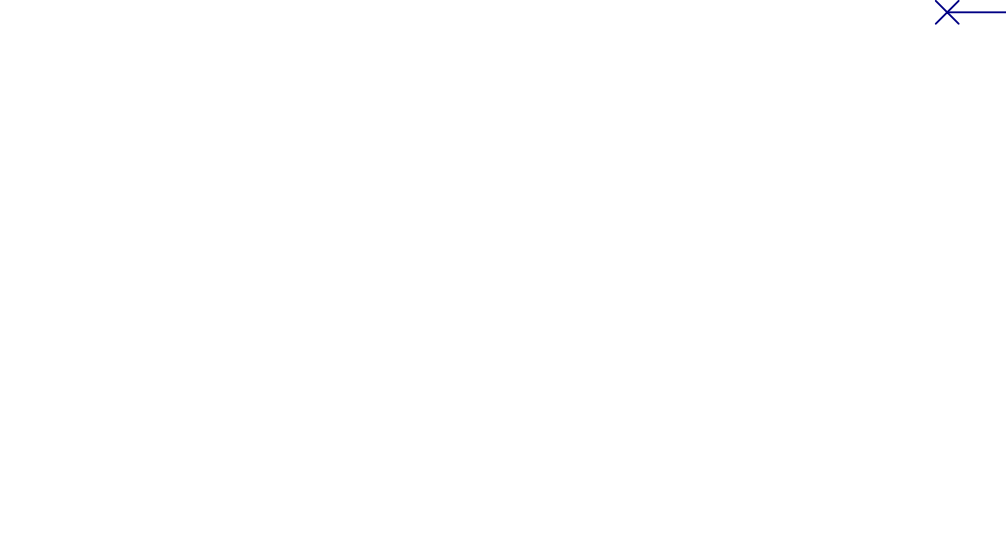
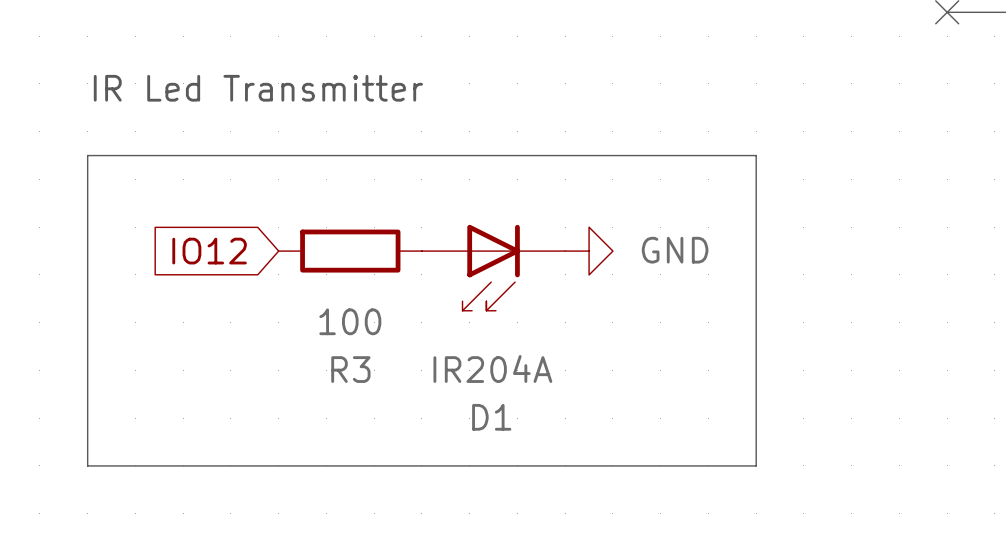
text: none -> IR Led Transmitter (258, 88)
line: none -> (87, 155) (87, 465) (756, 465) (756, 155) (87, 155)
global label: none -> IO12 (209, 251)
R3: none -> 100 (350, 251)
power symbol: none -> GND (589, 251)
D1: none -> IR204A (493, 267)

